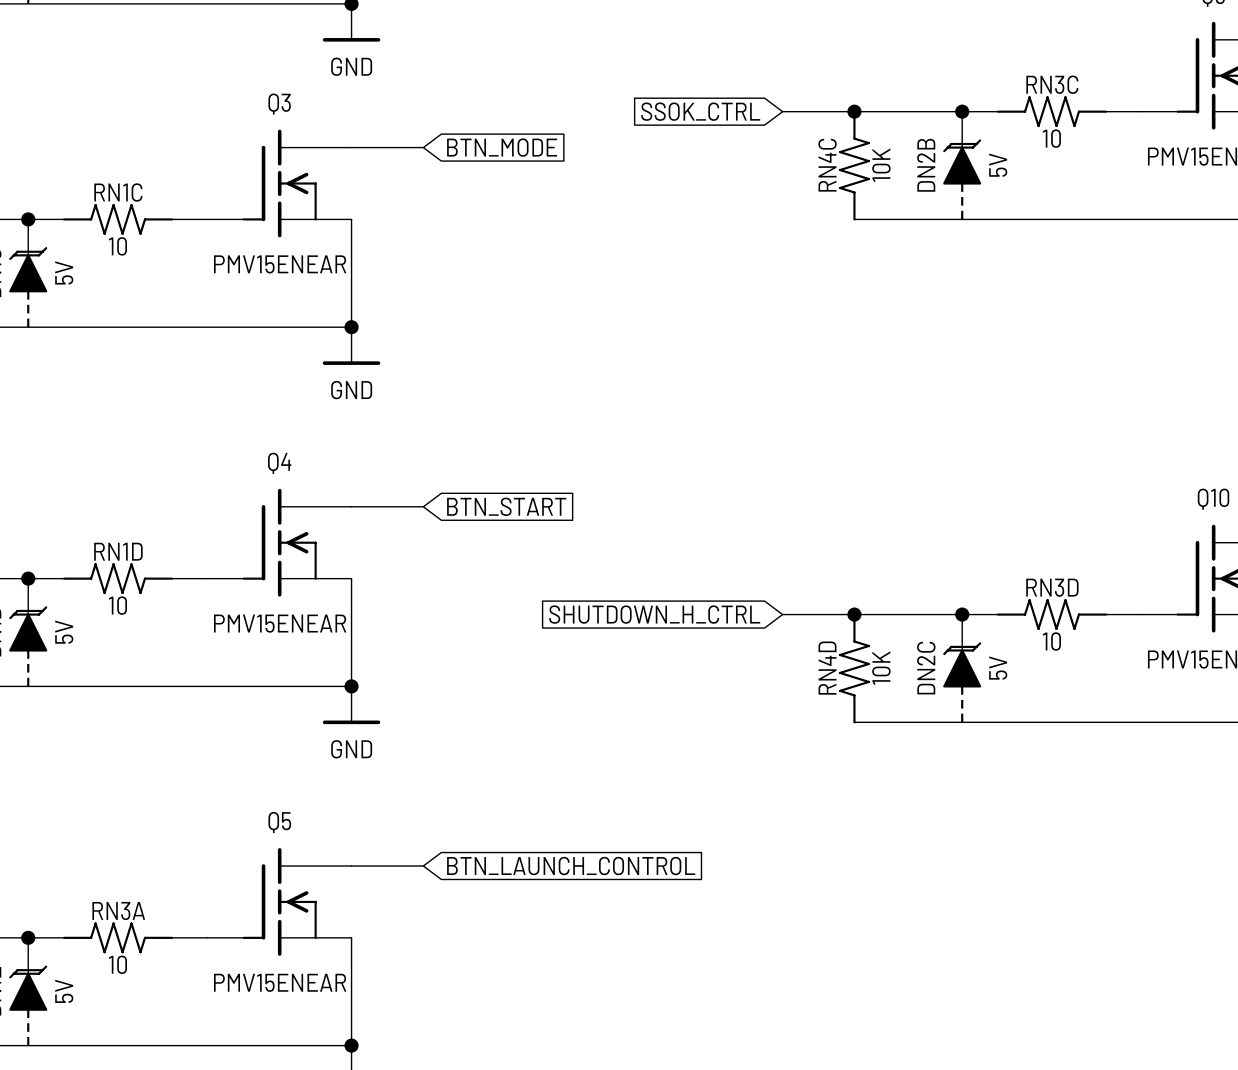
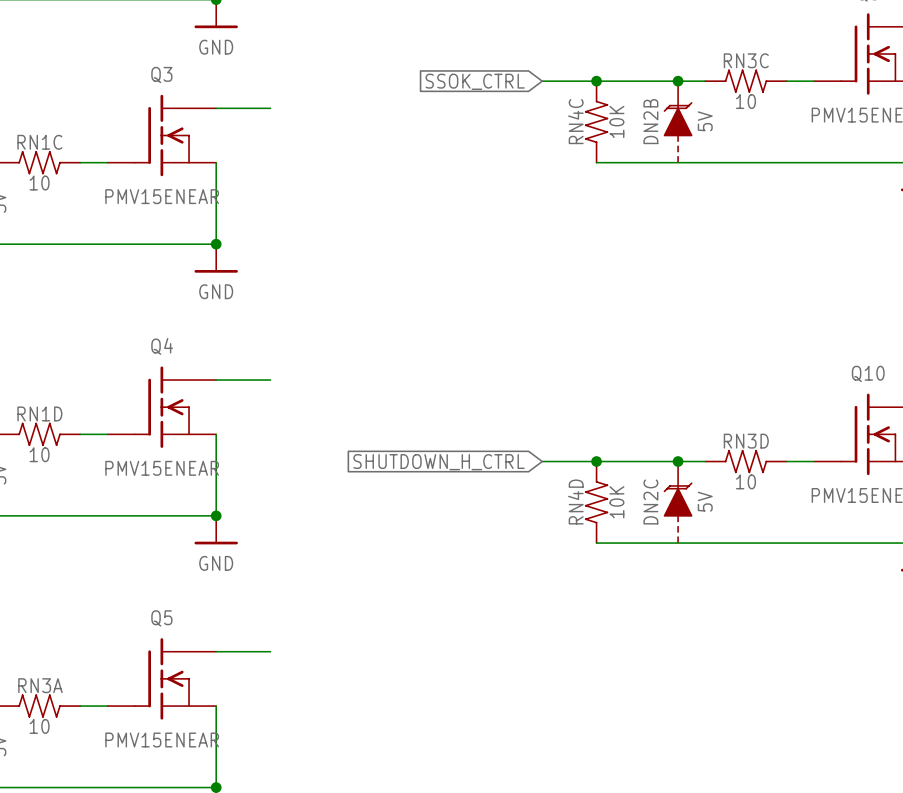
global label: BTN_MODE (502, 147) -> none
global label: BTN_START (506, 506) -> none
global label: BTN_LAUNCH_CONTROL (571, 866) -> none

